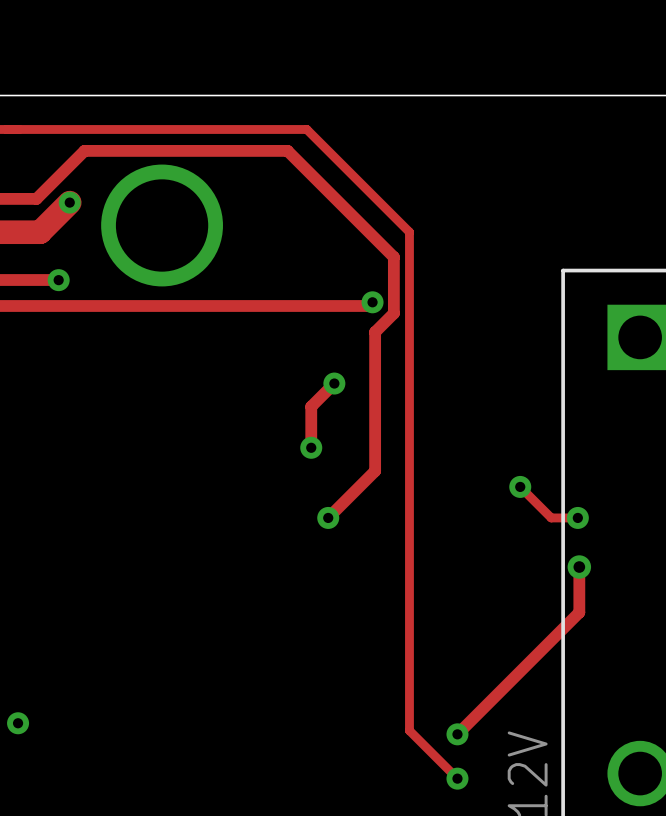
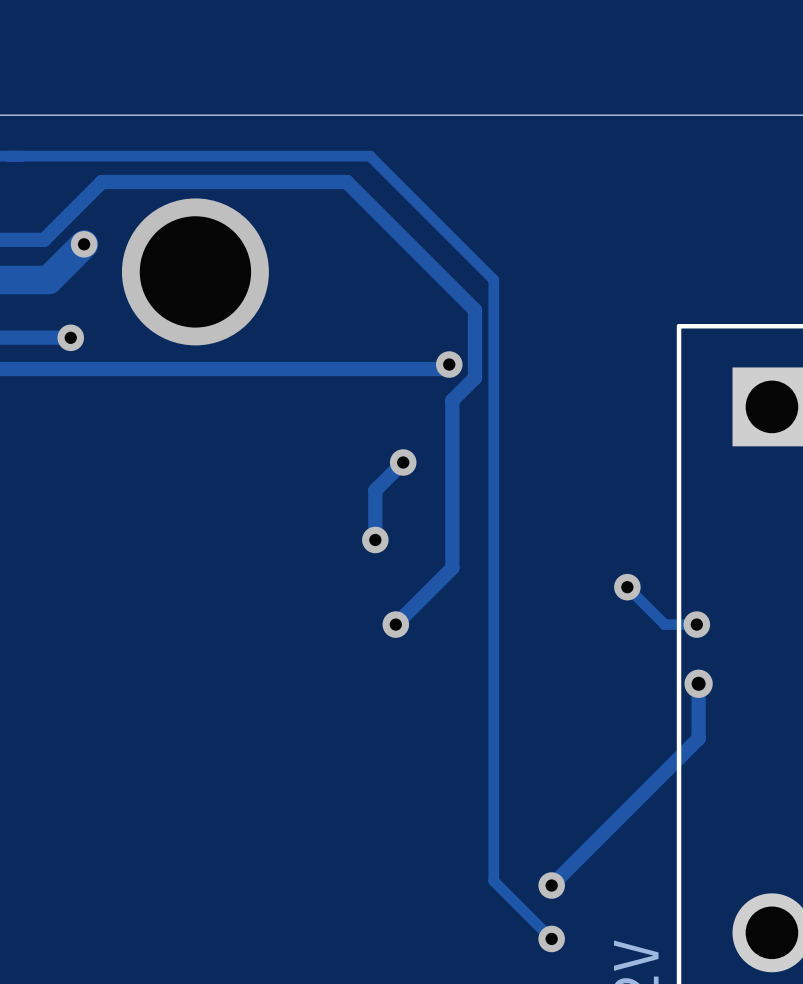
via: (18, 723) -> none

